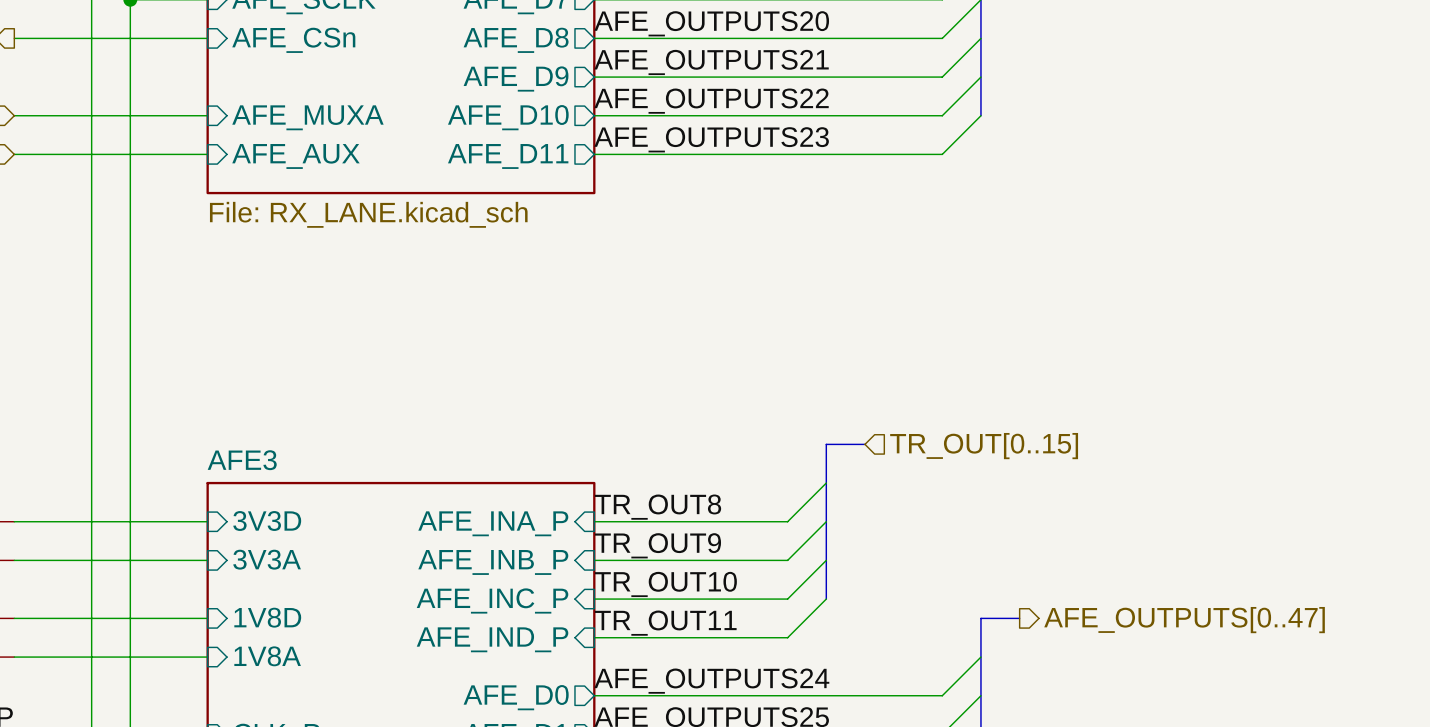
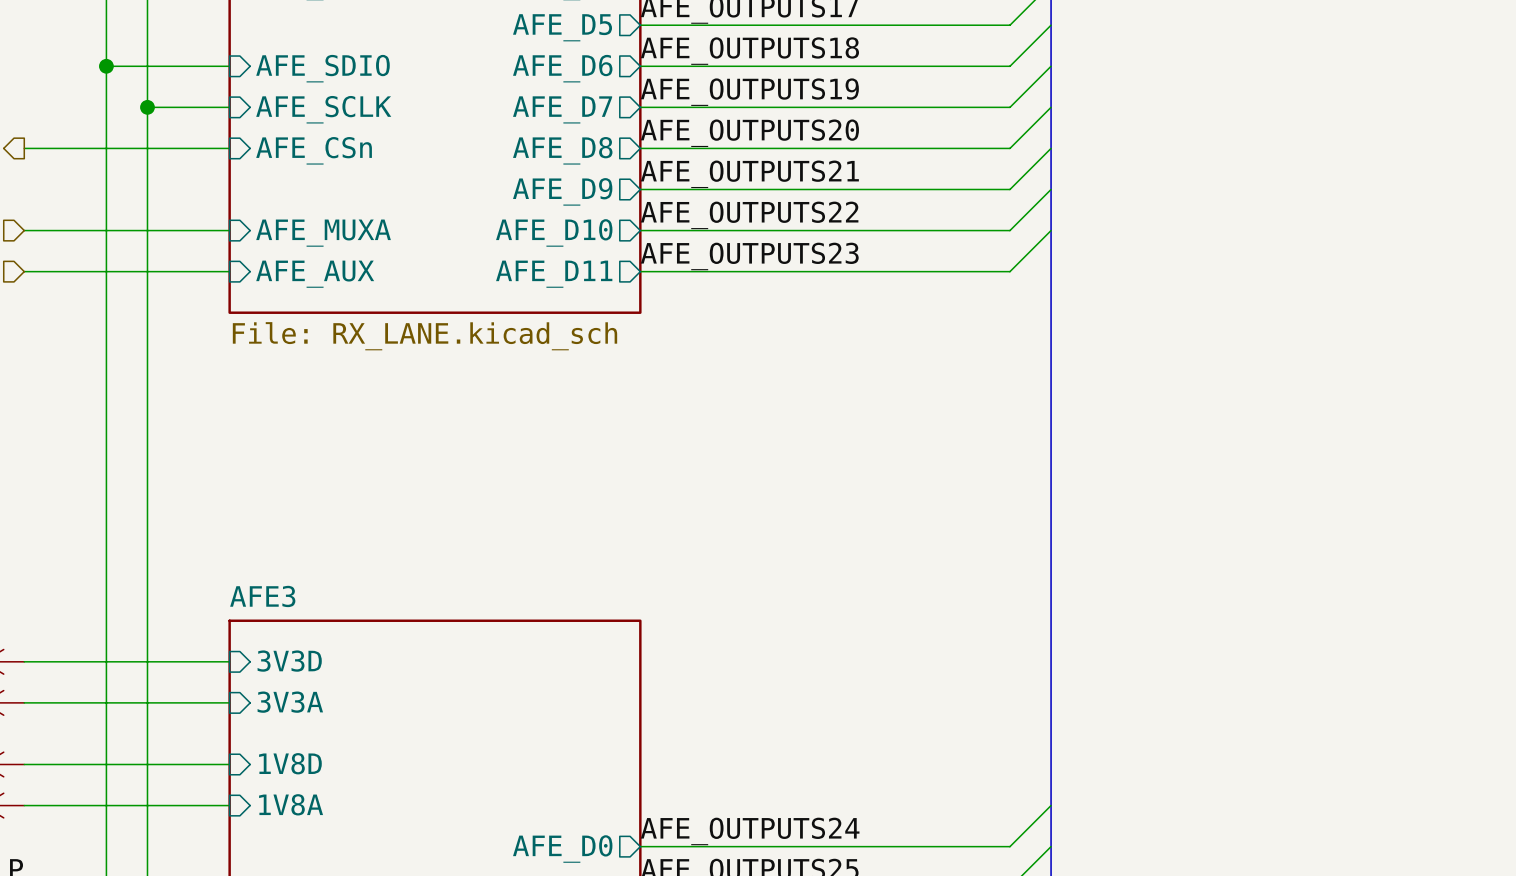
bus: (864, 444) (826, 444) (826, 599) -> none
hierarchical label: TR_OUT[0..15] (984, 446) -> none
wire: (826, 483) (787, 521) (594, 521) -> none
label: TR_OUT8 (658, 507) -> none
wire: (826, 521) (787, 560) (594, 560) -> none
sheet pin: AFE_INA_P (493, 523) -> none
label: TR_OUT9 (657, 545) -> none
wire: (826, 560) (787, 599) (594, 599) -> none
sheet pin: AFE_INB_P (493, 562) -> none
label: TR_OUT10 (665, 584) -> none
wire: (826, 599) (787, 637) (594, 637) -> none
sheet pin: AFE_INC_P (492, 600) -> none
bus: (980, 618) (1019, 618) -> (1051, 764) (1051, 230)
hierarchical label: AFE_OUTPUTS[0..47] (1184, 620) -> none
label: TR_OUT11 (665, 623) -> none
sheet pin: AFE_IND_P (492, 639) -> none

